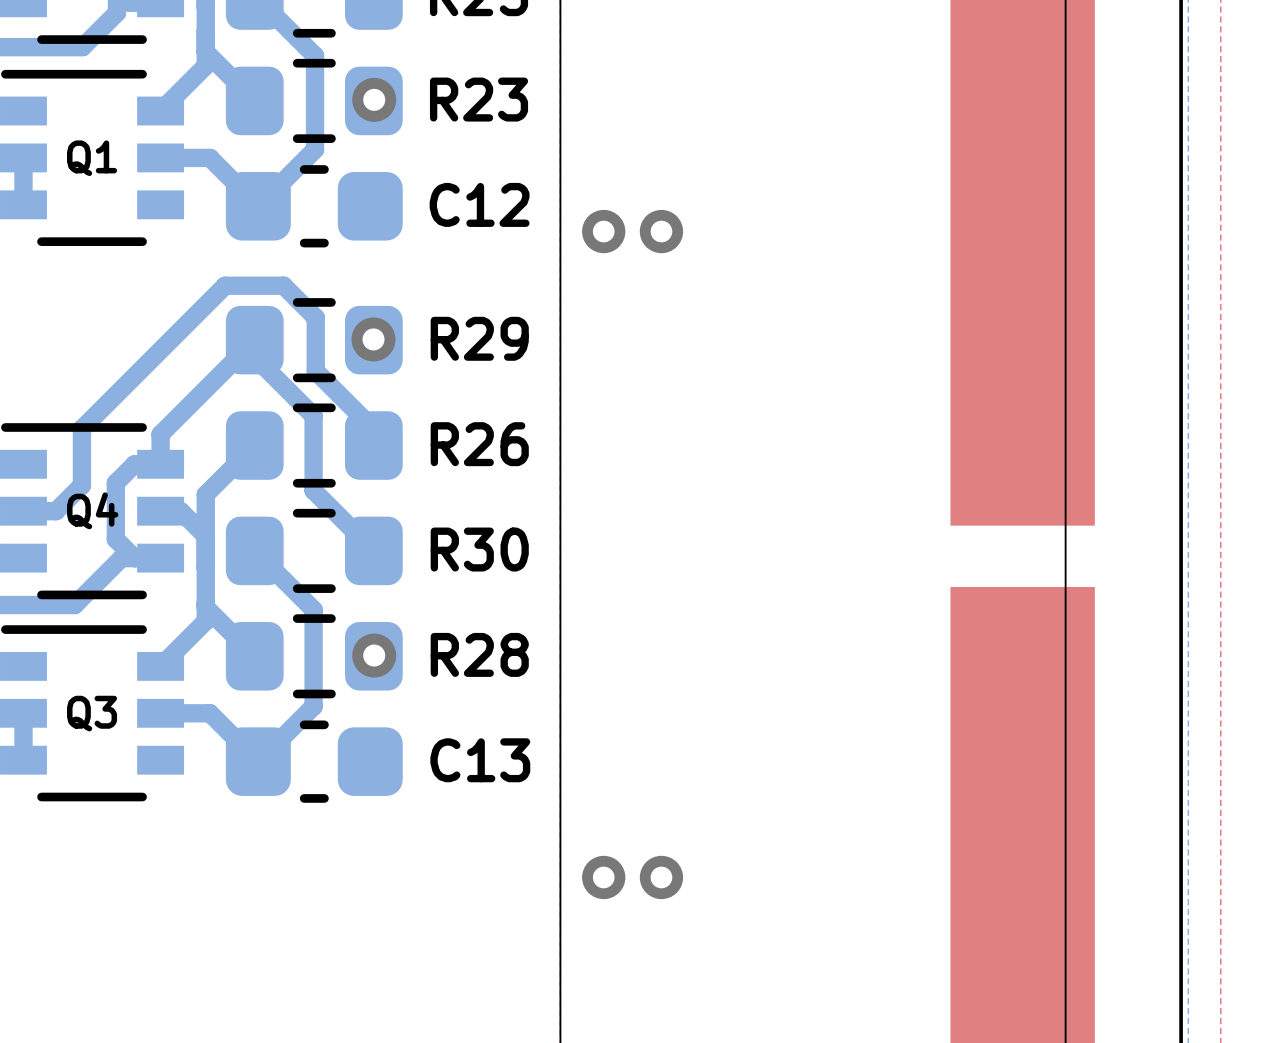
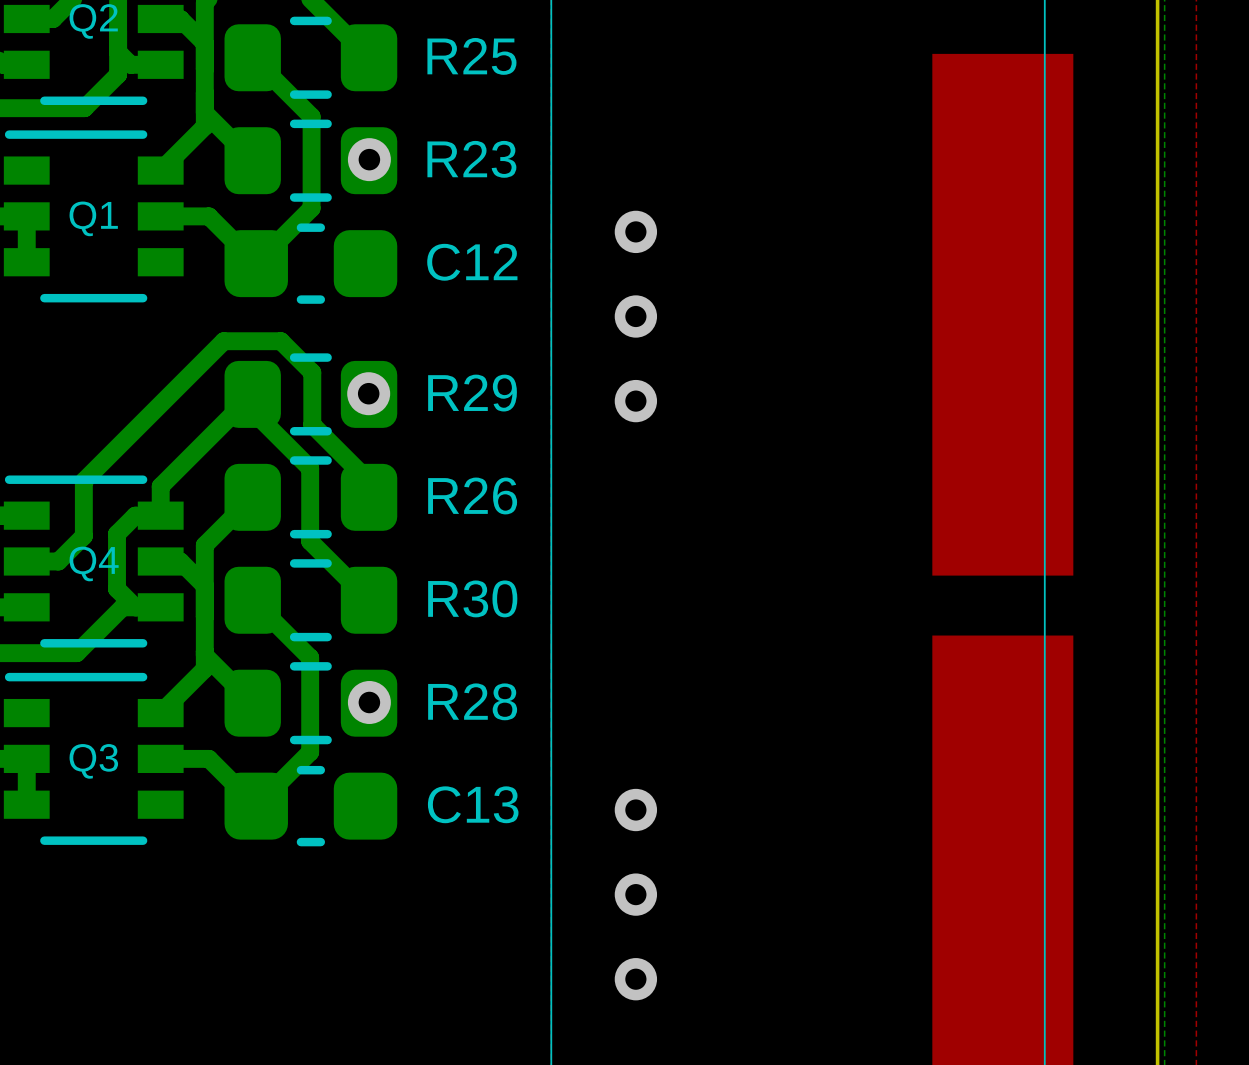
via: none -> (635, 231)
via: (603, 231) -> none
via: (661, 231) -> none
via: none -> (635, 316)
via: none -> (635, 401)
via: none -> (635, 810)
via: none -> (635, 894)
via: (603, 877) -> none
via: (661, 877) -> none
via: none -> (635, 979)

